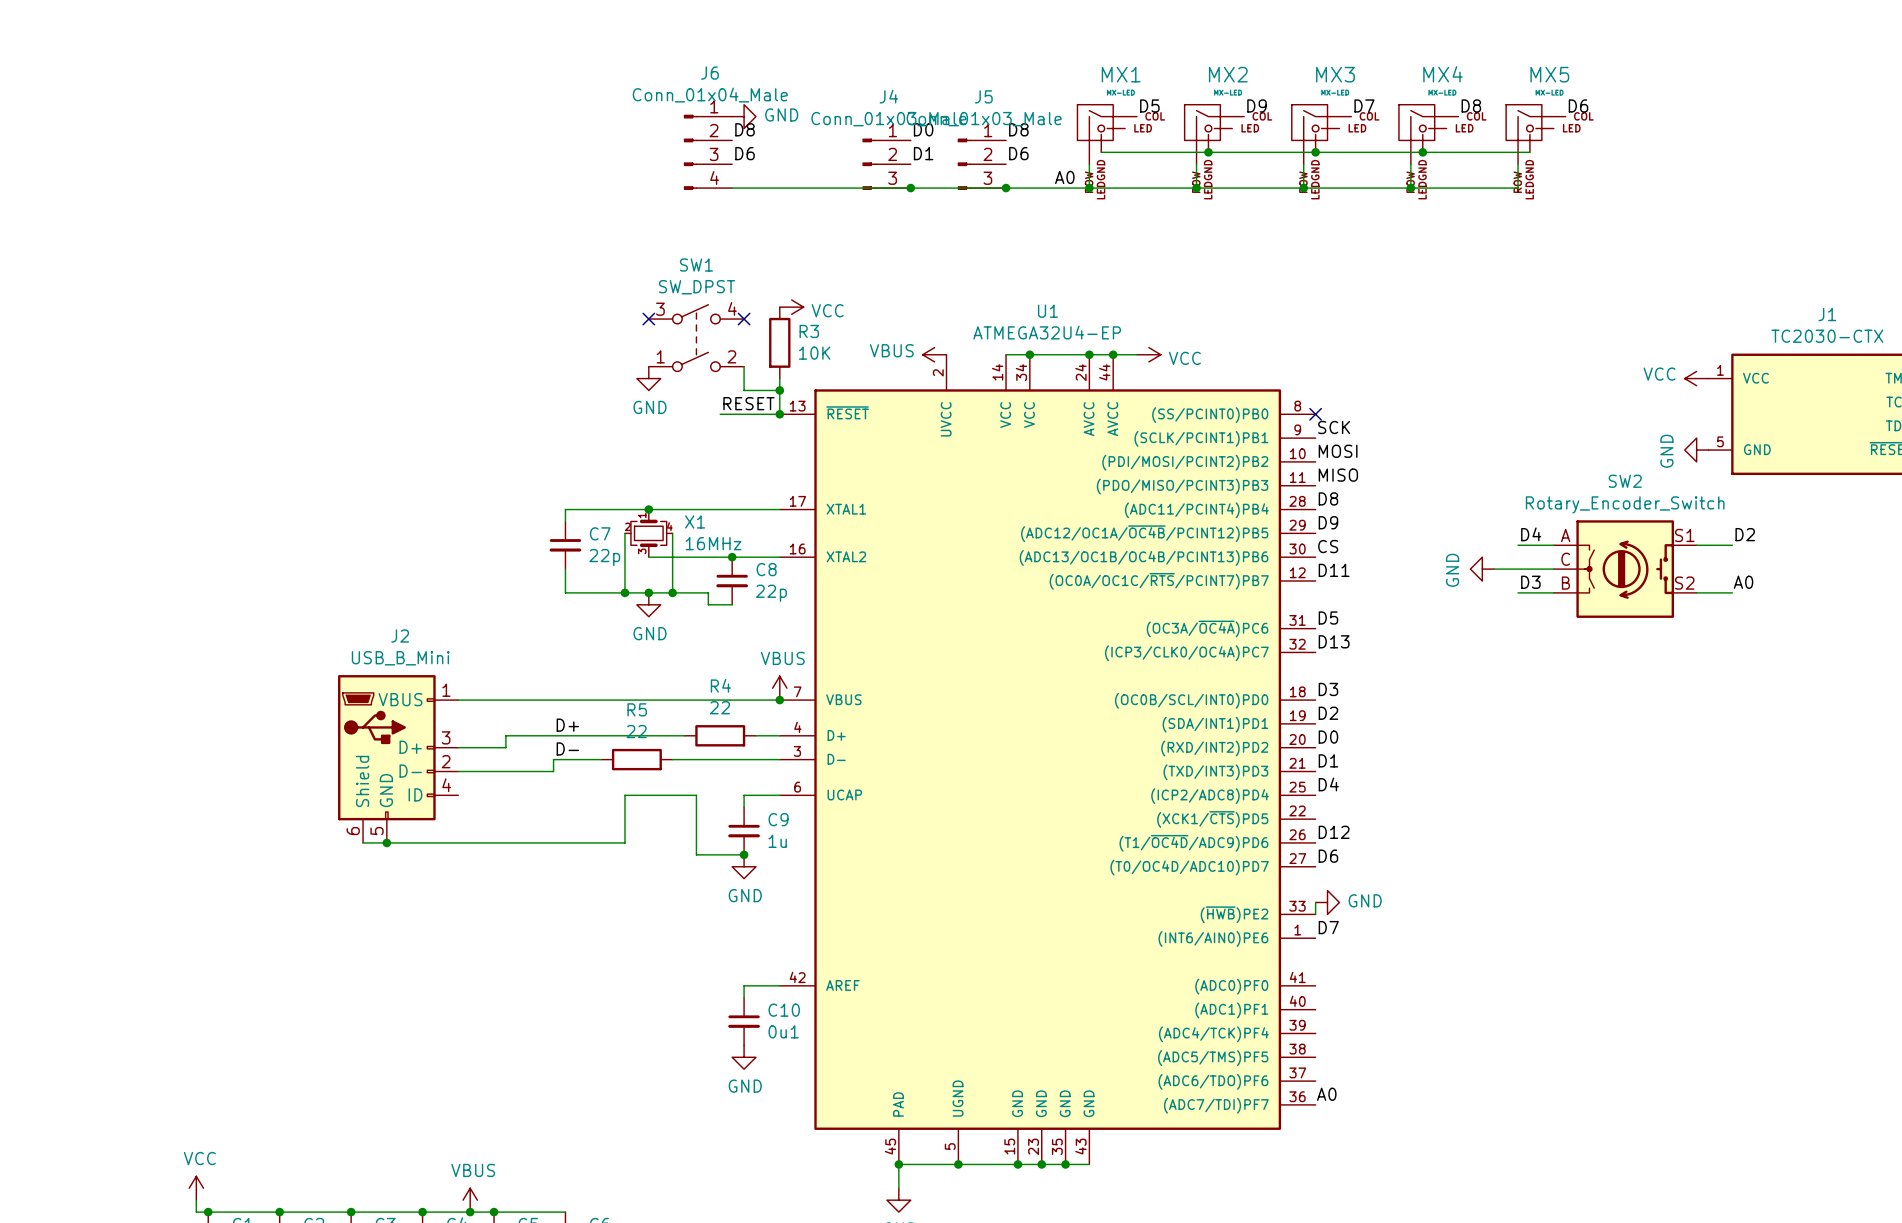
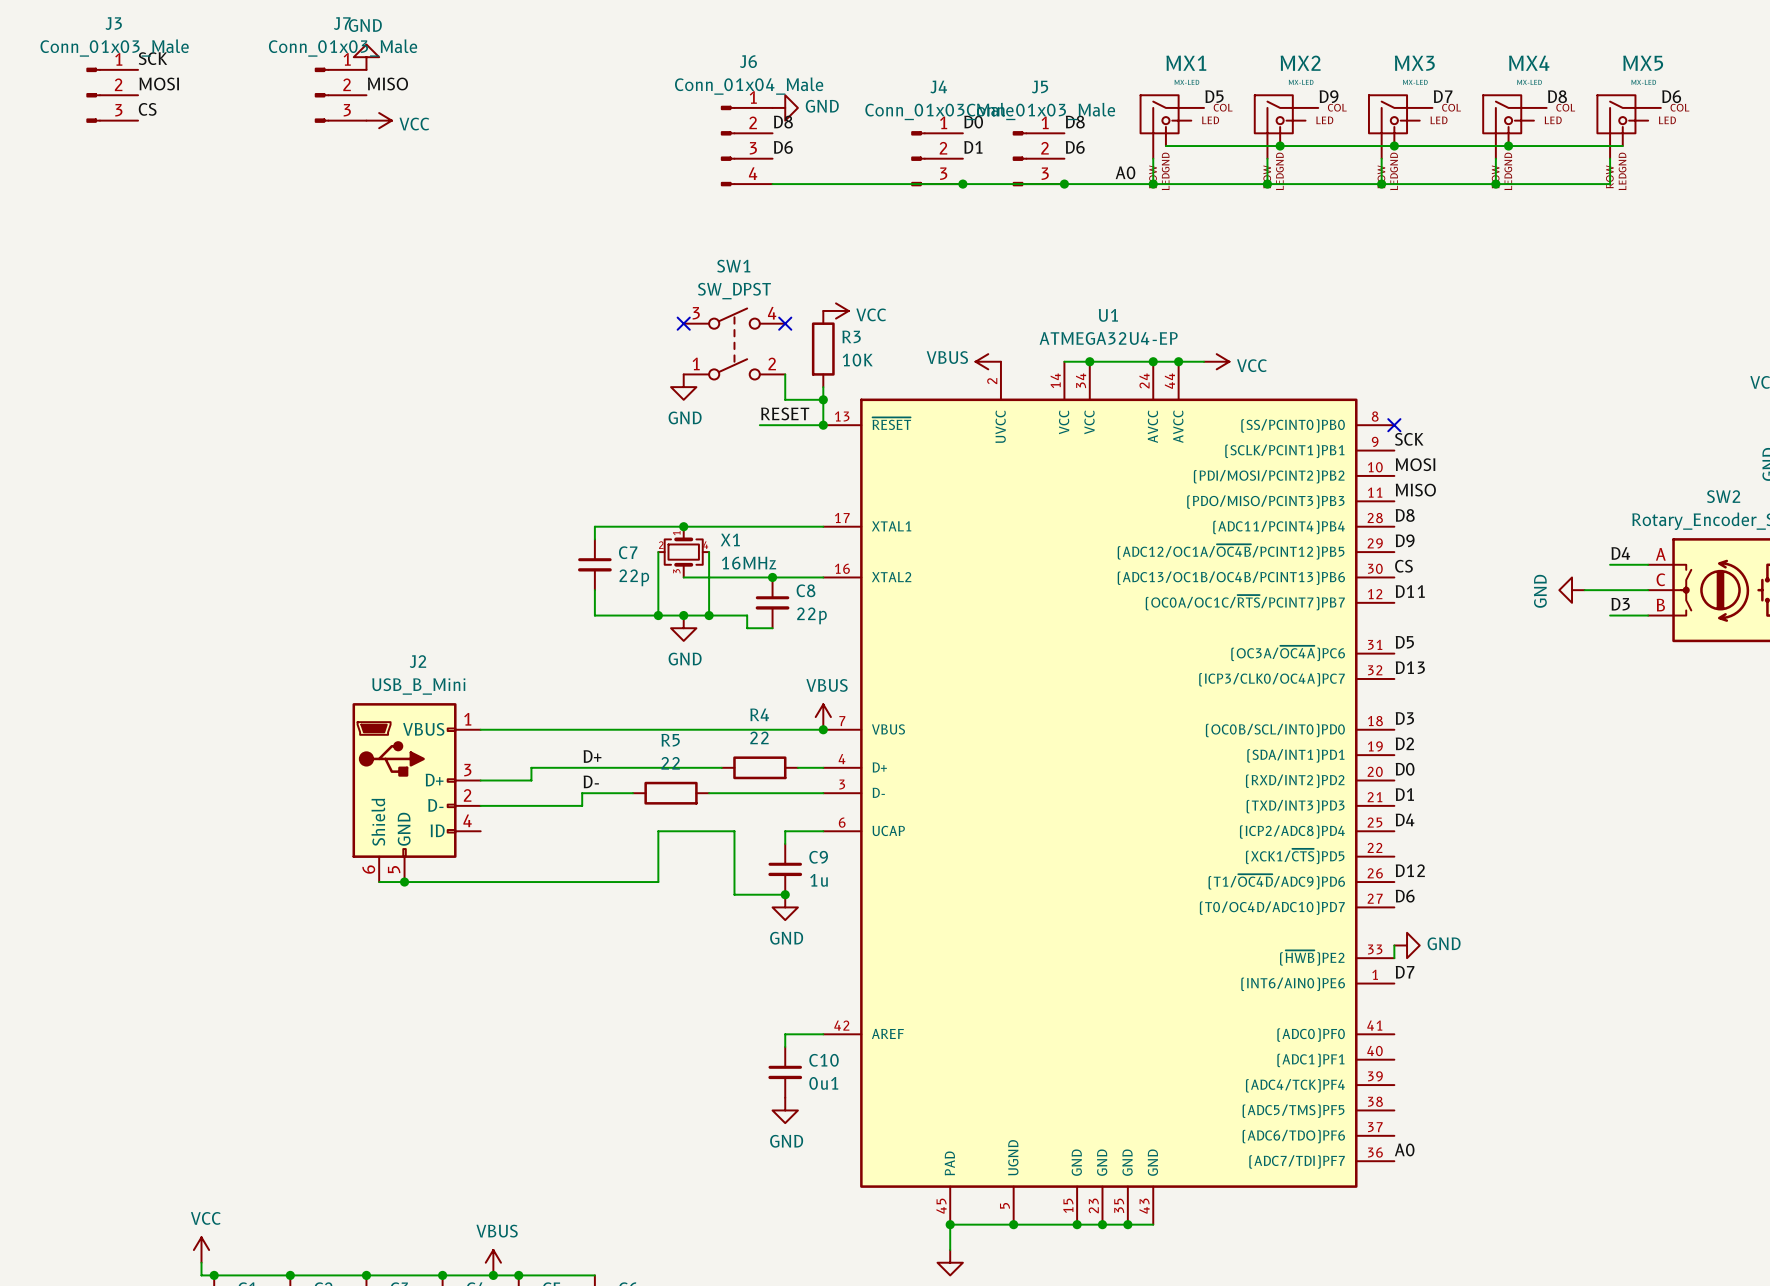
power symbol: none -> GND (366, 57)
label: none -> SCK (152, 58)
label: none -> MOSI (159, 84)
label: none -> MISO (387, 84)
J3: none -> Conn_01x03_Male (112, 95)
J7: none -> Conn_01x03_Male (340, 95)
label: none -> CS (147, 109)
power symbol: none -> VCC (379, 120)

